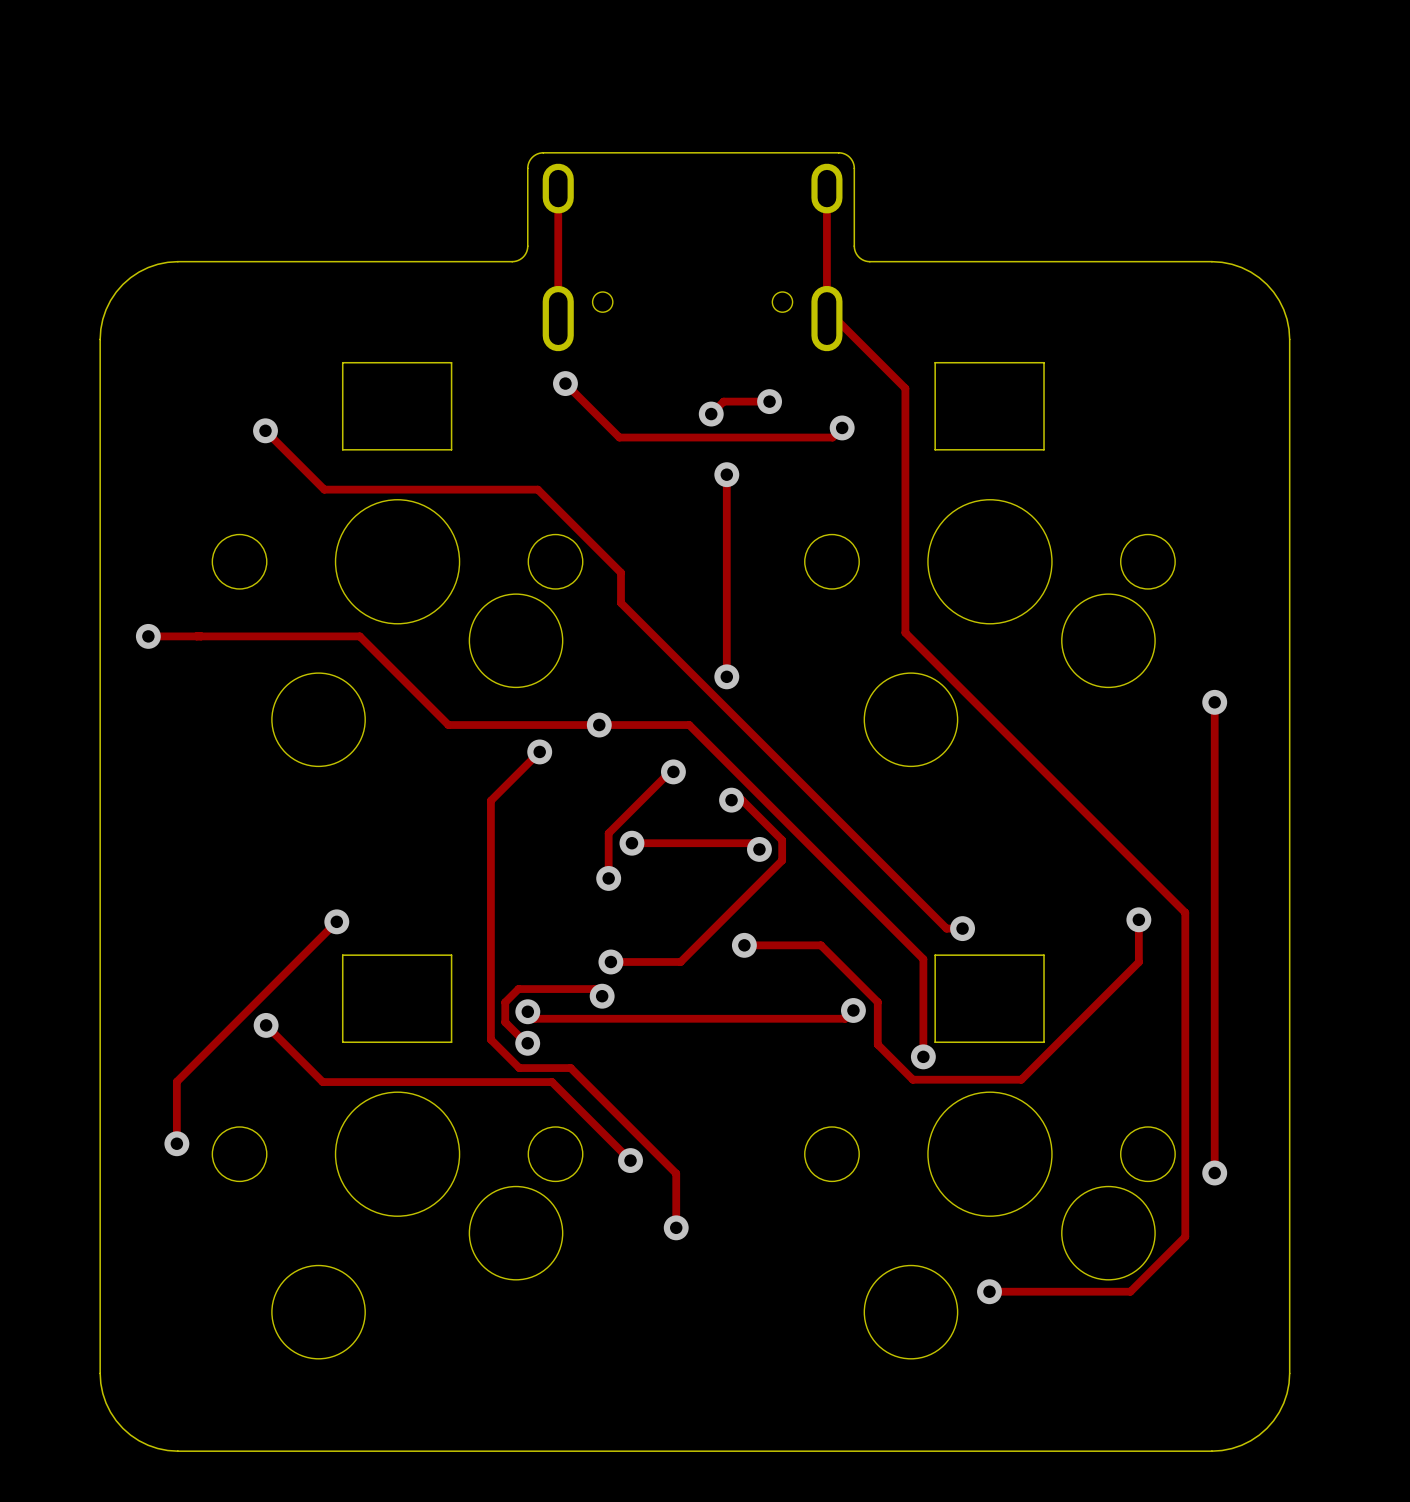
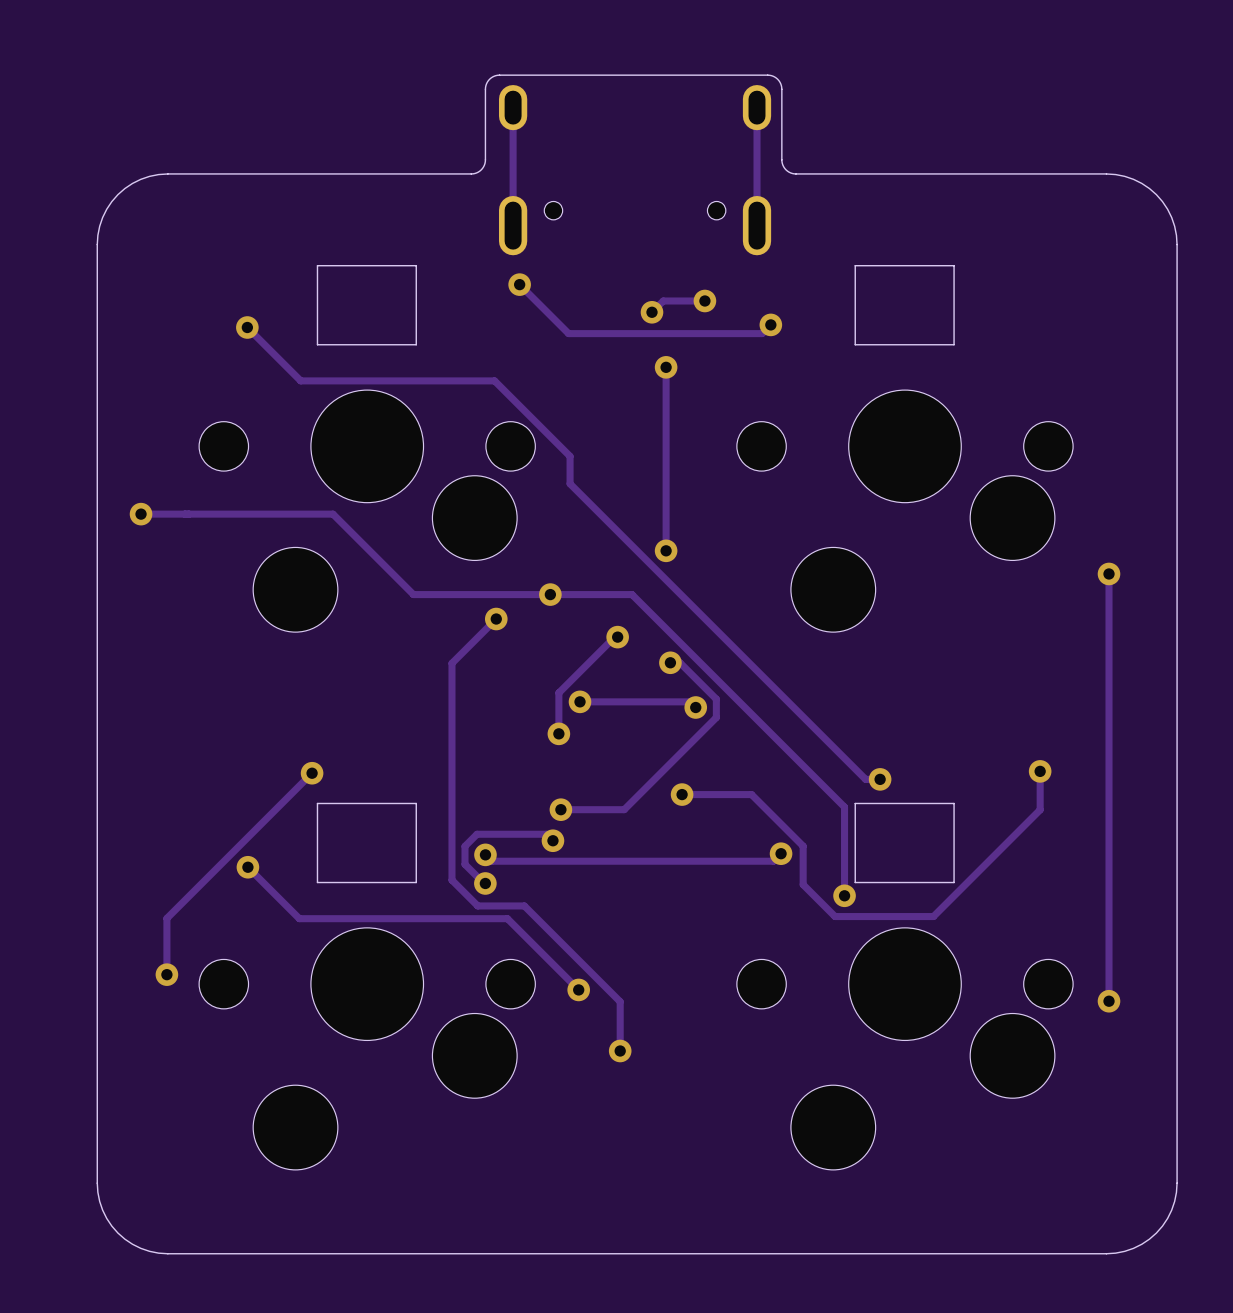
track: (826, 309) (905, 388) (905, 632) (1185, 912) (1185, 1236) (1130, 1291) (989, 1291) -> none
via: (989, 1291) -> none

